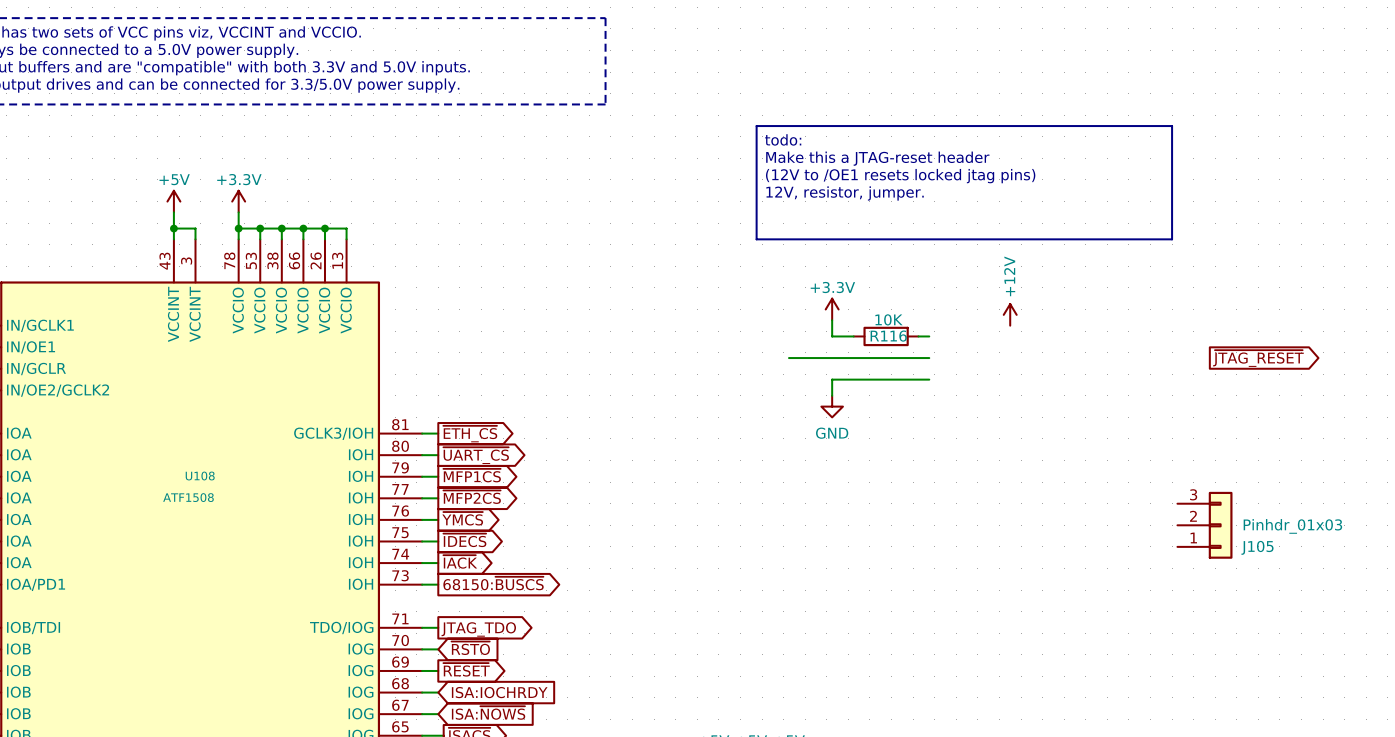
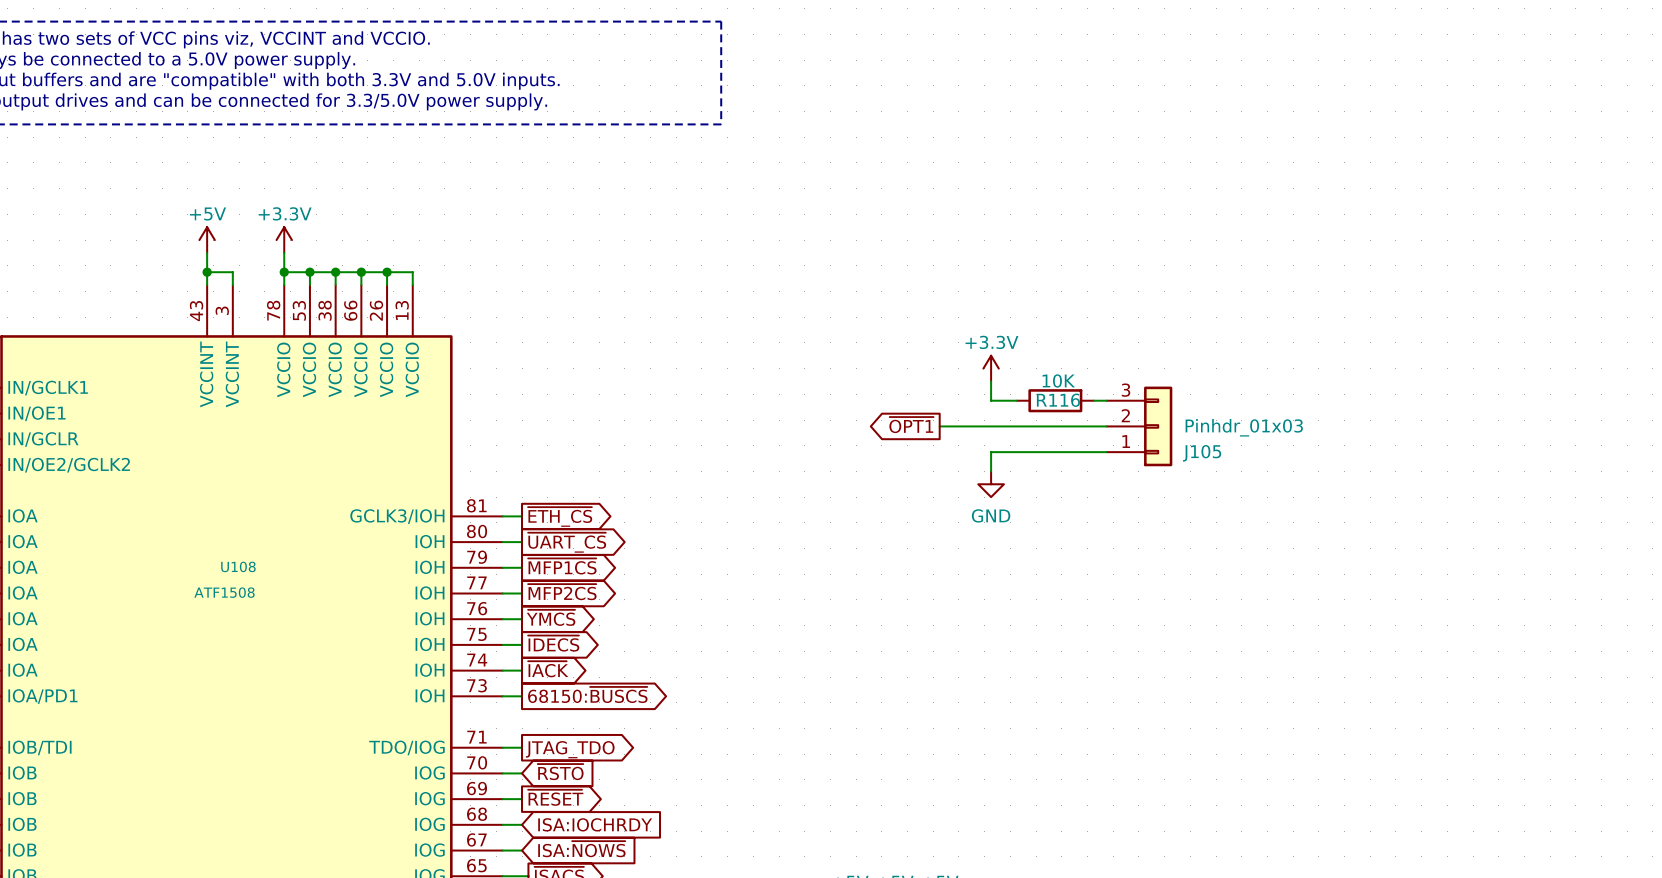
line: (756, 126) (1172, 126) (1172, 239) (756, 239) (756, 126) -> none
text: todo: (783, 139) -> none
text: Make this a JTAG-reset header (877, 158) -> none
text: (12V to /OE1 resets locked jtag pins) (900, 176) -> none
text: 12V, resistor, jumper. (845, 193) -> none
power symbol: +12V (1010, 314) -> none
global label: none -> ~{OPT1} (911, 425)
global label: ~{JTAG_RESET} (1258, 358) -> none
J105 position: (1204, 525) -> (1139, 426)

